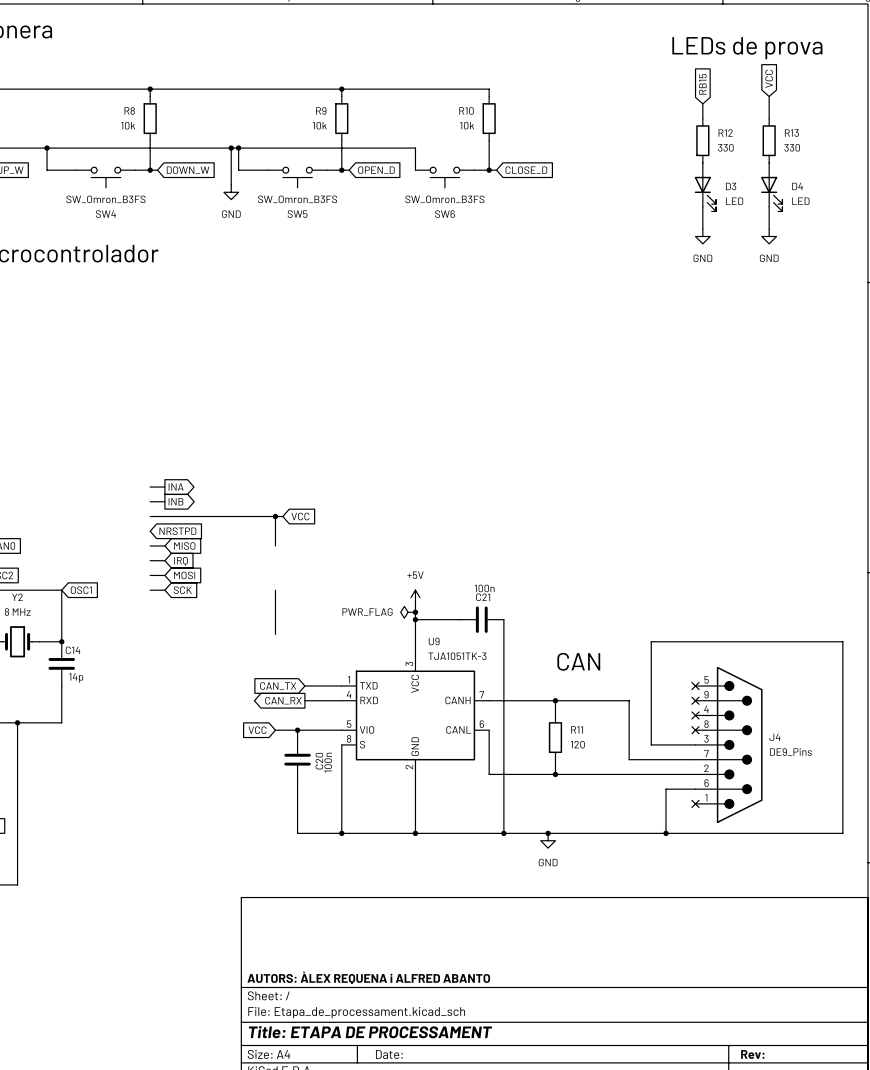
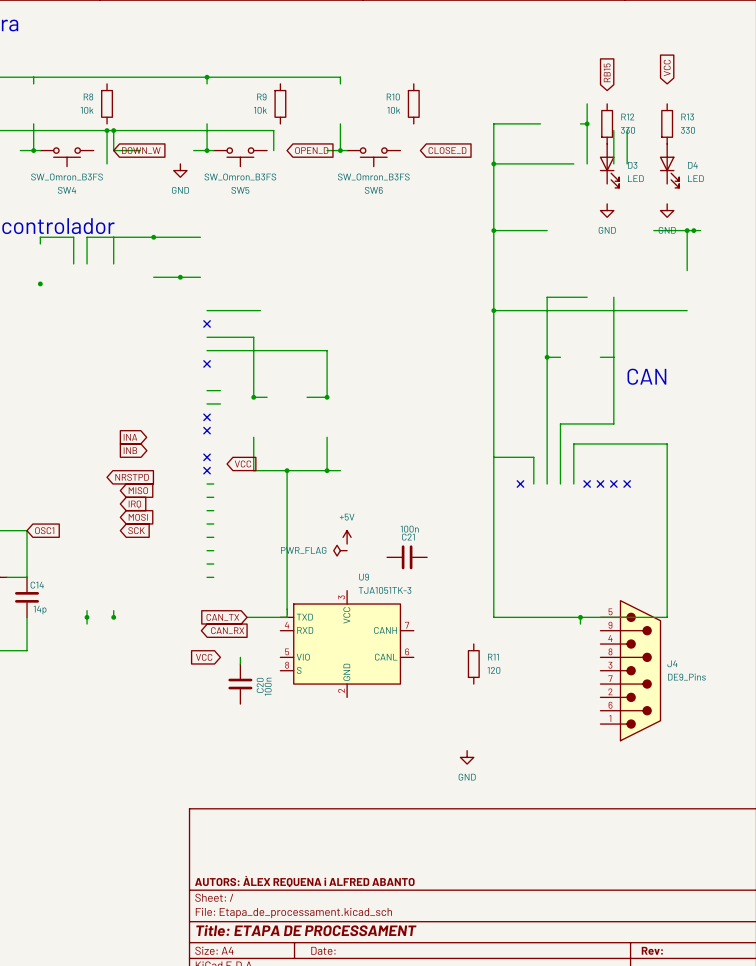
text: LEDs de prova (747, 48) -> none
wire: (150, 89) (150, 96) -> (33, 77) (33, 83)
junction: (150, 89) -> none
junction: none -> (207, 77)
wire: (341, 89) (341, 96) -> (207, 77) (207, 83)
junction: (341, 89) -> none
wire: (408, 89) (489, 89) (489, 96) -> (340, 77) (340, 83)
wire: (769, 96) (769, 118) -> none
wire: (702, 103) (702, 118) -> none
wire: none -> (587, 103) (587, 163)
wire: none -> (33, 123) (33, 150)
wire: (150, 140) (150, 148) -> none
wire: (341, 140) (341, 170) -> (207, 123) (207, 150)
wire: (489, 140) (489, 170) -> (340, 123) (340, 150)
wire: none -> (540, 123) (493, 123) (493, 617) (667, 617) (667, 443) (573, 443) (573, 483)
wire: none -> (580, 123) (587, 123)
junction: none -> (587, 123)
wire: (47, 148) (47, 170) (54, 170) -> none
junction position: (47, 148) -> (33, 150)
junction: none -> (107, 130)
wire: none -> (113, 130) (113, 150) (140, 150)
junction: none -> (113, 130)
wire: (231, 148) (231, 184) -> none
junction: (231, 148) -> none
wire: (238, 148) (238, 170) (245, 170) -> none
junction: (238, 148) -> none
wire: (334, 148) (415, 148) (415, 170) -> (327, 150) (347, 150)
wire: none -> (273, 130) (273, 150)
wire: none -> (613, 130) (613, 163)
wire: none -> (627, 130) (627, 163)
wire: (135, 170) (157, 170) -> none
wire: none -> (107, 150) (107, 163)
junction: (150, 170) -> none
junction: none -> (207, 150)
wire: (327, 170) (349, 170) -> none
junction: (341, 170) -> none
junction: none -> (340, 150)
wire: (474, 170) (496, 170) -> none
junction: (489, 170) -> none
wire: none -> (493, 163) (573, 163)
junction: none -> (493, 163)
wire: (702, 207) (702, 229) -> none
wire: (769, 207) (769, 229) -> none
wire: none -> (493, 230) (547, 230)
junction: none -> (493, 230)
wire: none -> (653, 230) (700, 230)
wire: none -> (687, 230) (687, 270)
junction: none -> (687, 230)
junction: none -> (693, 230)
wire: none -> (113, 237) (113, 263)
junction: none -> (153, 237)
wire: none -> (200, 237) (87, 237) (87, 263)
wire: none -> (40, 243) (40, 237) (73, 237) (73, 263)
wire: none -> (153, 277) (200, 277)
junction: none -> (180, 277)
junction: none -> (40, 283)
wire: none -> (587, 297) (547, 297) (547, 483)
wire: none -> (613, 297) (613, 423) (560, 423) (560, 483)
wire: none -> (207, 310) (260, 310)
wire: none -> (493, 310) (687, 310)
junction: none -> (493, 310)
no-connect mark: none -> (207, 323)
wire: none -> (207, 337) (253, 337) (253, 397) (267, 397)
wire: none -> (207, 350) (327, 350) (327, 397) (307, 397)
wire: none -> (547, 357) (560, 357)
junction: none -> (547, 357)
wire: none -> (600, 357) (613, 357)
no-connect mark: none -> (207, 363)
text: none -> CAN (646, 376)
junction: none -> (253, 397)
junction: none -> (327, 397)
no-connect mark: none -> (207, 417)
no-connect mark: none -> (207, 430)
wire: (150, 487) (164, 487) -> (207, 390) (220, 390)
wire: none -> (253, 437) (253, 470) (340, 470)
wire: none -> (327, 437) (327, 470)
wire: (150, 501) (164, 501) -> (207, 403) (220, 403)
no-connect mark: none -> (207, 457)
wire: none -> (493, 457) (533, 457) (533, 483)
wire: (150, 516) (282, 516) -> none
wire: (275, 516) (275, 545) -> none
junction: (275, 516) -> none
no-connect mark: none -> (207, 470)
wire: none -> (287, 470) (287, 617) (280, 617)
junction: none -> (287, 470)
junction: none -> (327, 470)
wire: none -> (207, 483) (213, 483)
no-connect mark: none -> (520, 483)
no-connect mark: none -> (587, 483)
no-connect mark: none -> (600, 483)
no-connect mark: none -> (613, 483)
no-connect mark: none -> (627, 483)
wire: (150, 545) (164, 545) -> none
wire: none -> (207, 497) (213, 497)
wire: (150, 560) (164, 560) -> none
wire: none -> (207, 510) (213, 510)
wire: (150, 575) (164, 575) -> none
wire: none -> (207, 524) (213, 524)
wire: (150, 590) (164, 590) -> none
wire: (275, 590) (275, 634) -> none
wire: none -> (207, 537) (213, 537)
wire: (415, 604) (415, 656) -> none
wire: none -> (207, 550) (213, 550)
junction: (415, 612) -> none
wire: (415, 619) (459, 619) -> none
junction: (415, 619) -> none
wire: (503, 619) (503, 833) -> none
wire: none -> (207, 564) (213, 564)
junction: (61, 641) -> none
wire: none -> (207, 577) (213, 577)
text: CAN (578, 661) -> none
wire: none -> (87, 610) (87, 624)
wire: none -> (113, 610) (113, 617)
junction: none -> (87, 617)
junction: none -> (113, 617)
wire: none -> (580, 617) (580, 624)
junction: none -> (580, 617)
no-connect mark: (695, 685) -> none
wire: (304, 700) (341, 700) -> none
wire: (489, 700) (629, 700) (629, 759) (695, 759) -> none
wire: (555, 700) (555, 715) -> none
junction: (555, 700) -> none
no-connect mark: (695, 700) -> none
no-connect mark: (695, 715) -> none
wire: (275, 730) (341, 730) -> none
junction: (297, 730) -> none
wire: (489, 730) (489, 774) (695, 774) -> none
no-connect mark: (695, 730) -> none
wire: (341, 744) (341, 833) -> none
wire: (695, 744) (651, 744) (651, 641) (842, 641) (842, 833) (297, 833) (297, 781) -> none
wire: (555, 759) (555, 774) -> none
wire: (415, 774) (415, 833) -> none
junction: (555, 774) -> none
wire: (695, 789) (666, 789) (666, 833) -> none
no-connect mark: (695, 803) -> none
junction: (341, 833) -> none
junction: (415, 833) -> none
junction: (503, 833) -> none
junction: (548, 833) -> none
junction: (666, 833) -> none

